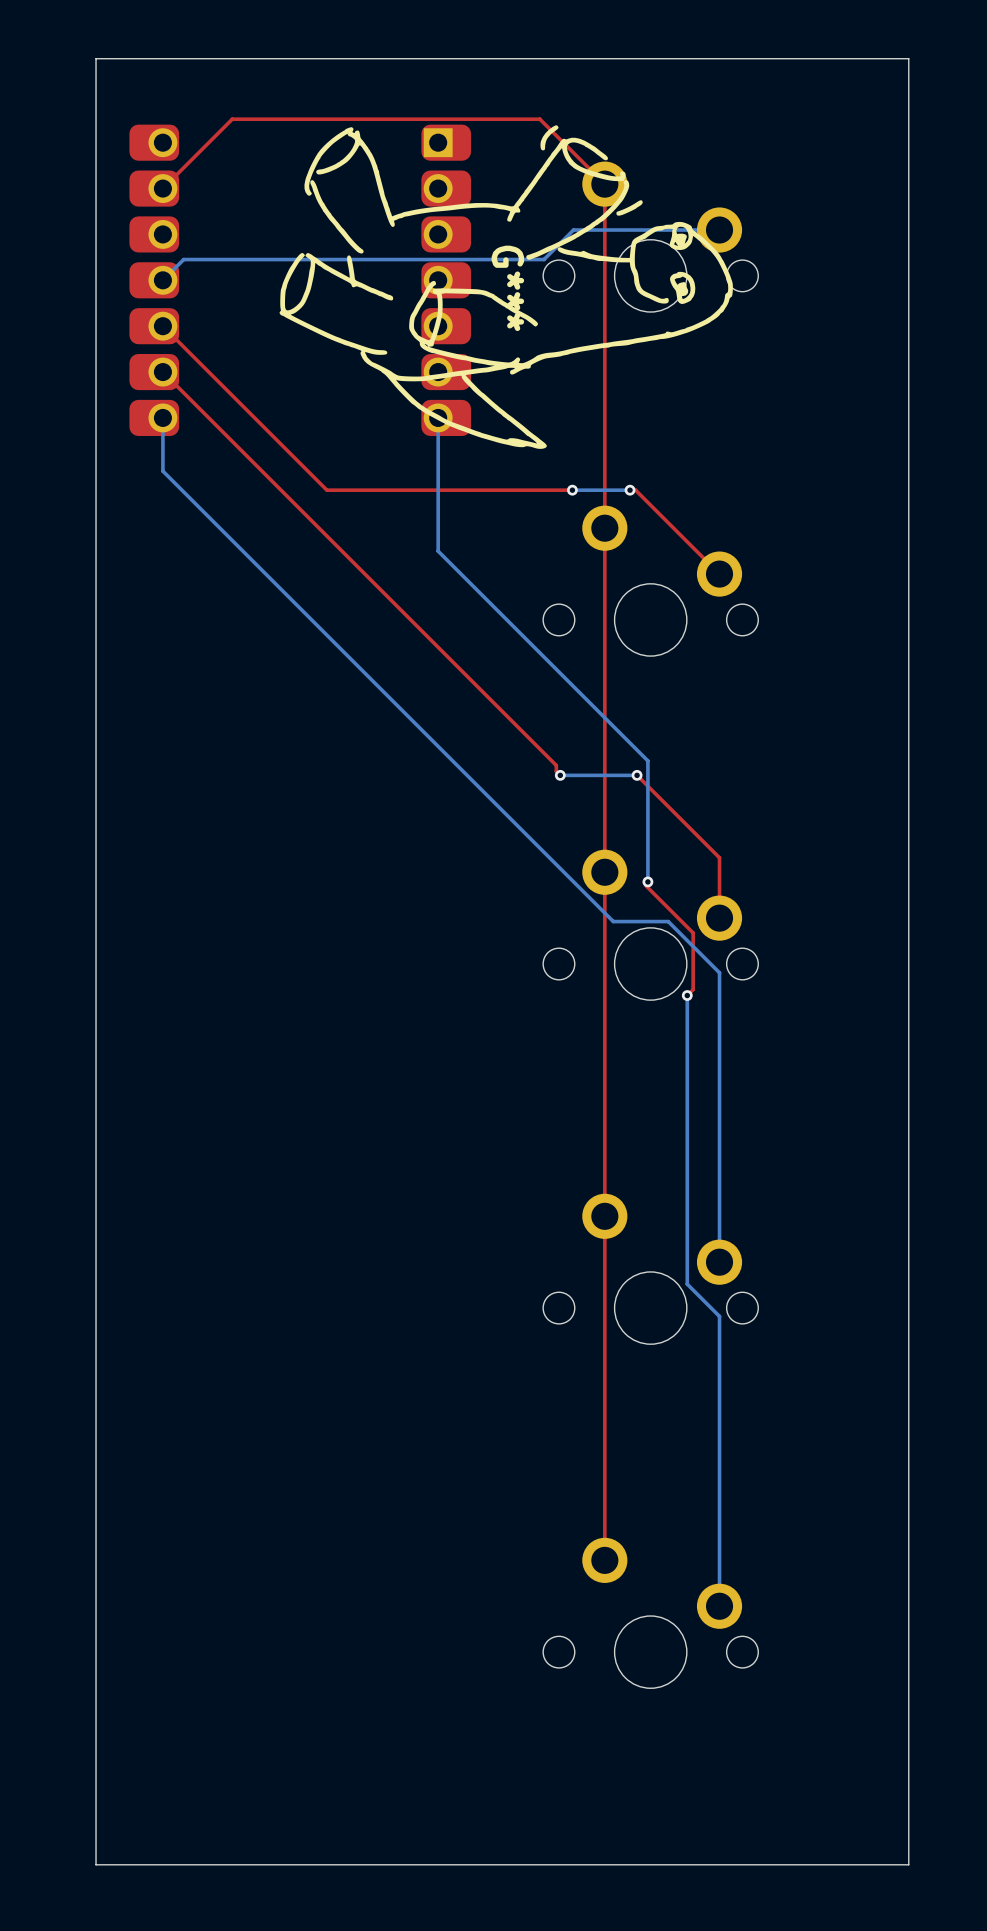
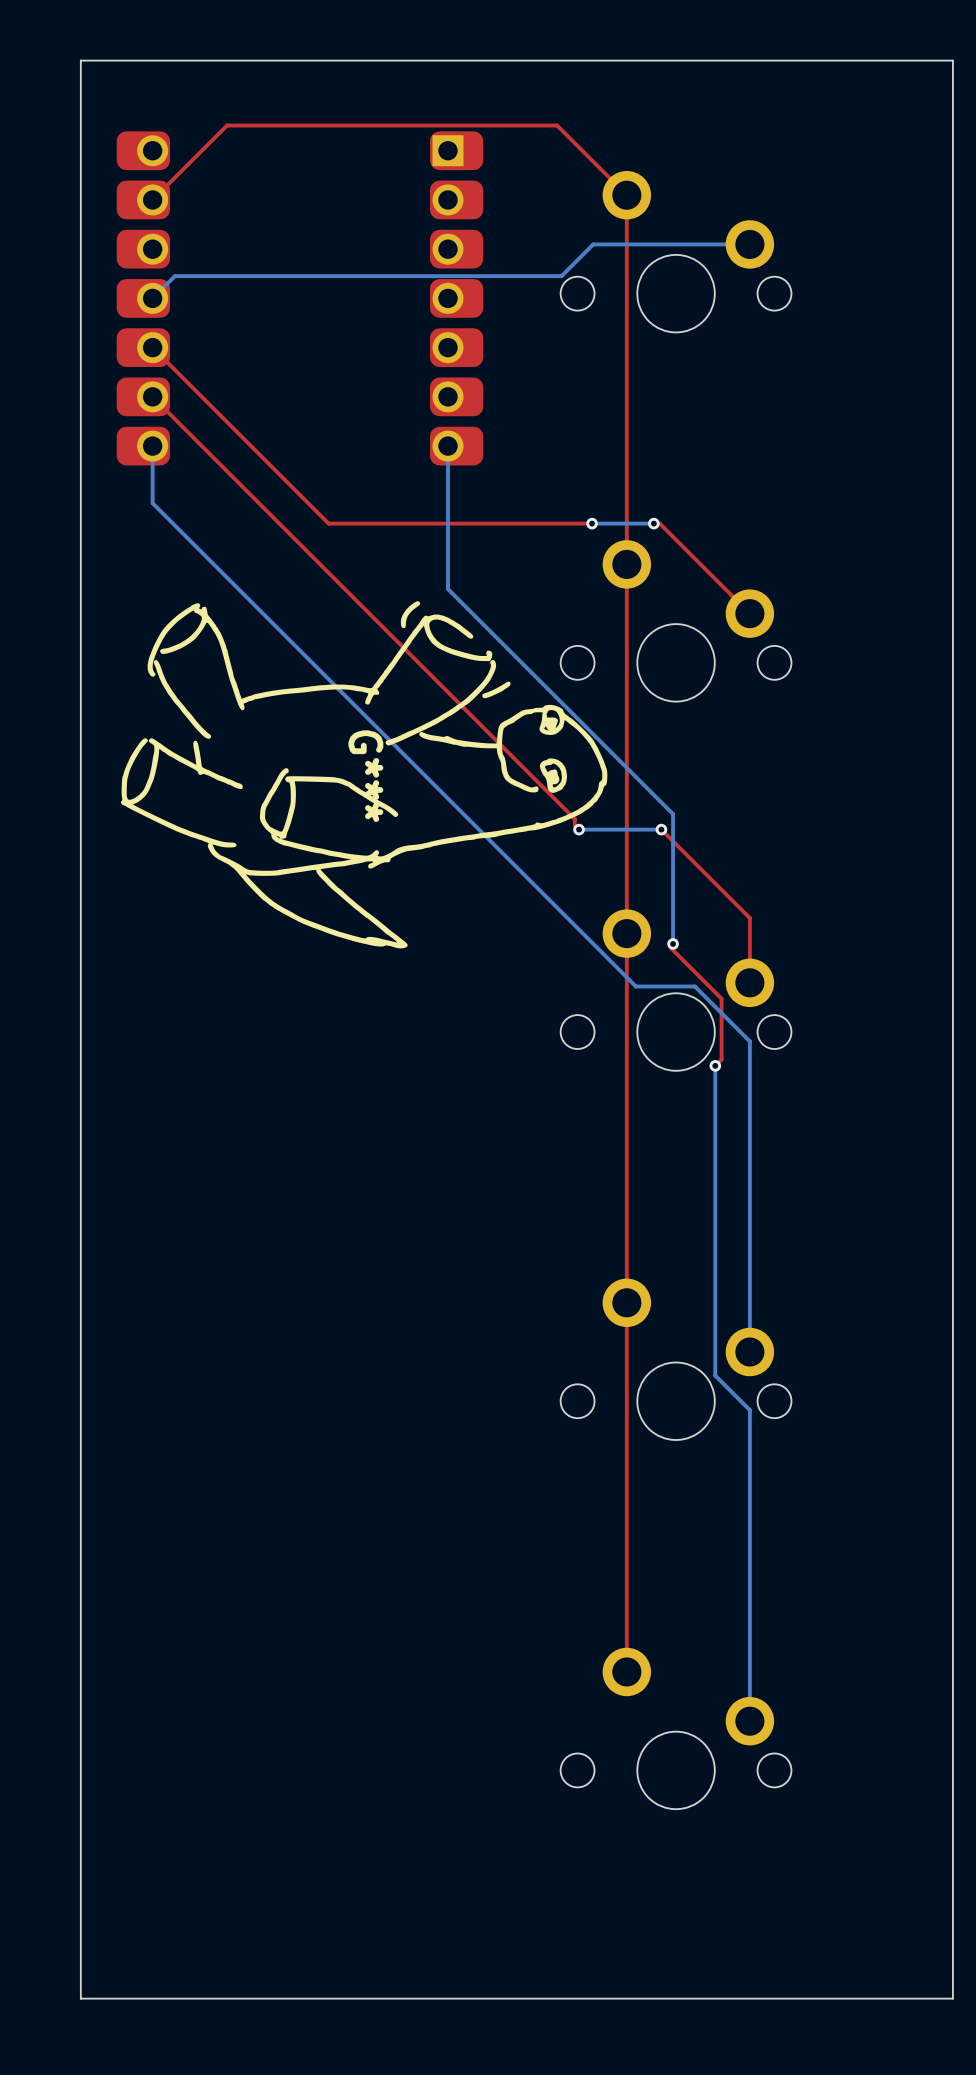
G***: (506, 287) -> none
G***: none -> (364, 774)

